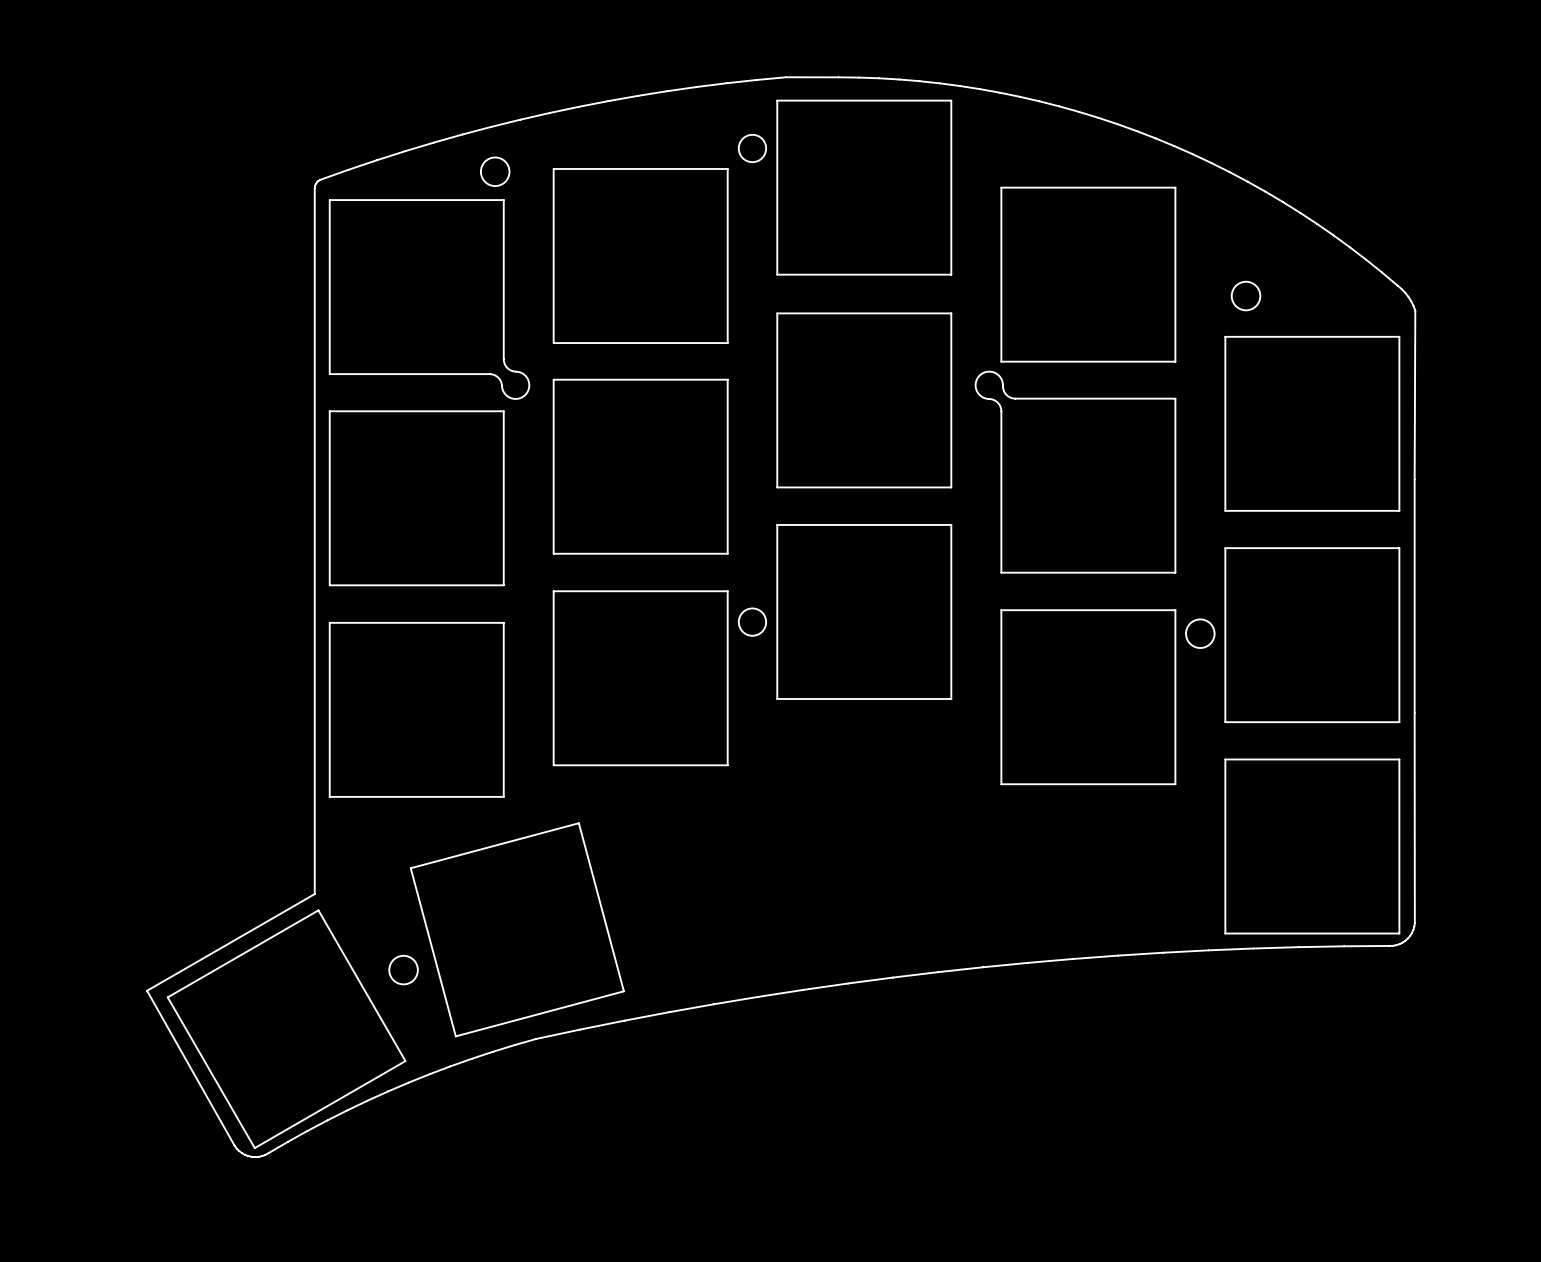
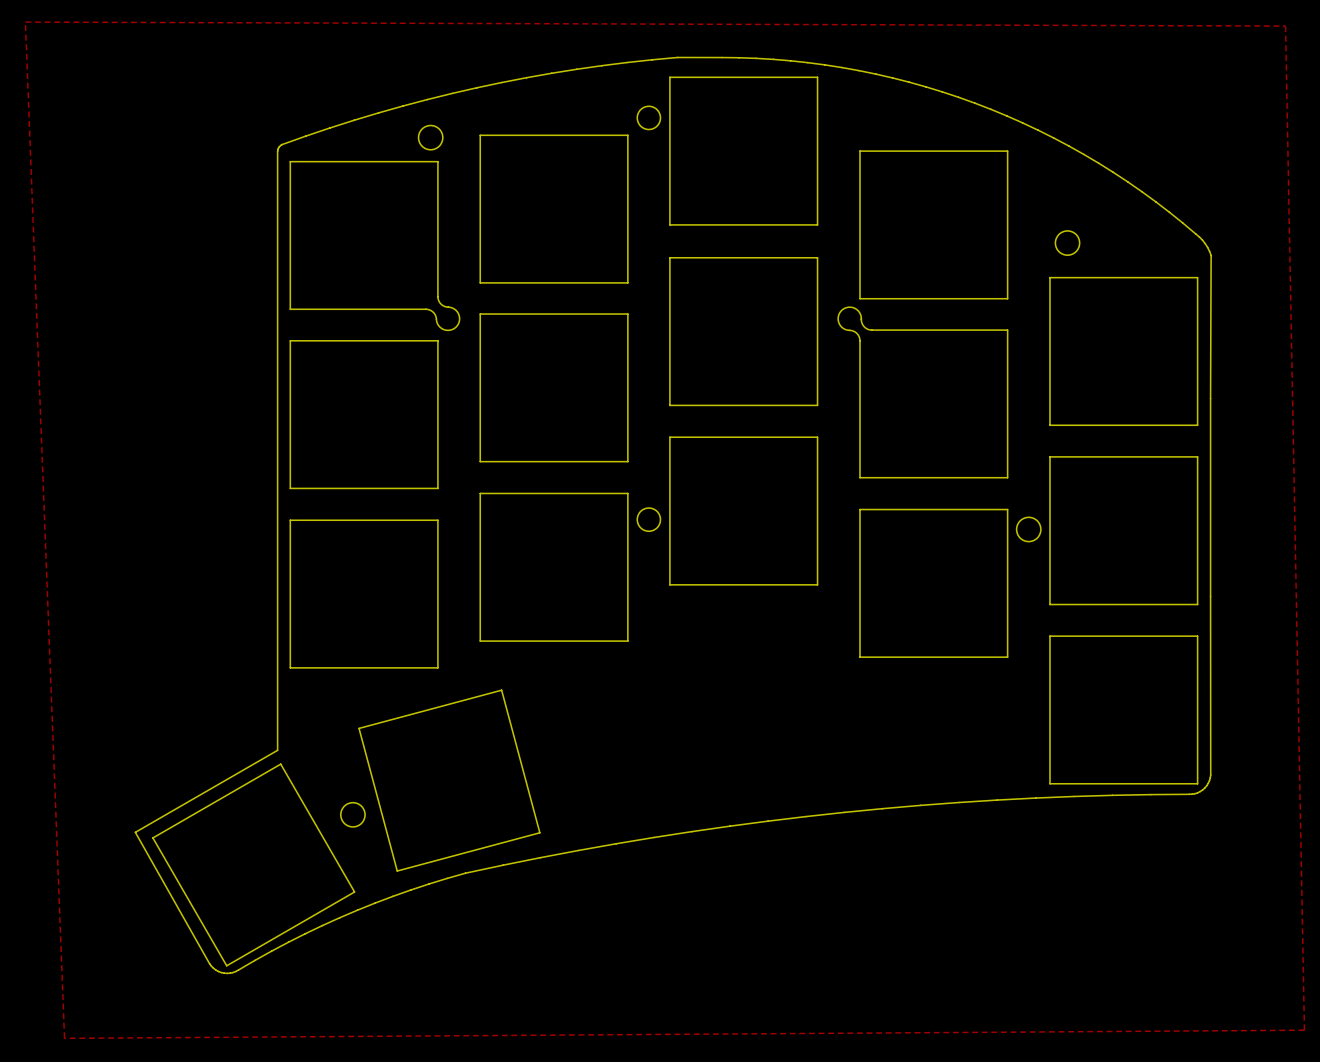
zone outline: none -> (25, 22) (1285, 26) (1304, 1030) (64, 1038) (25, 22)

